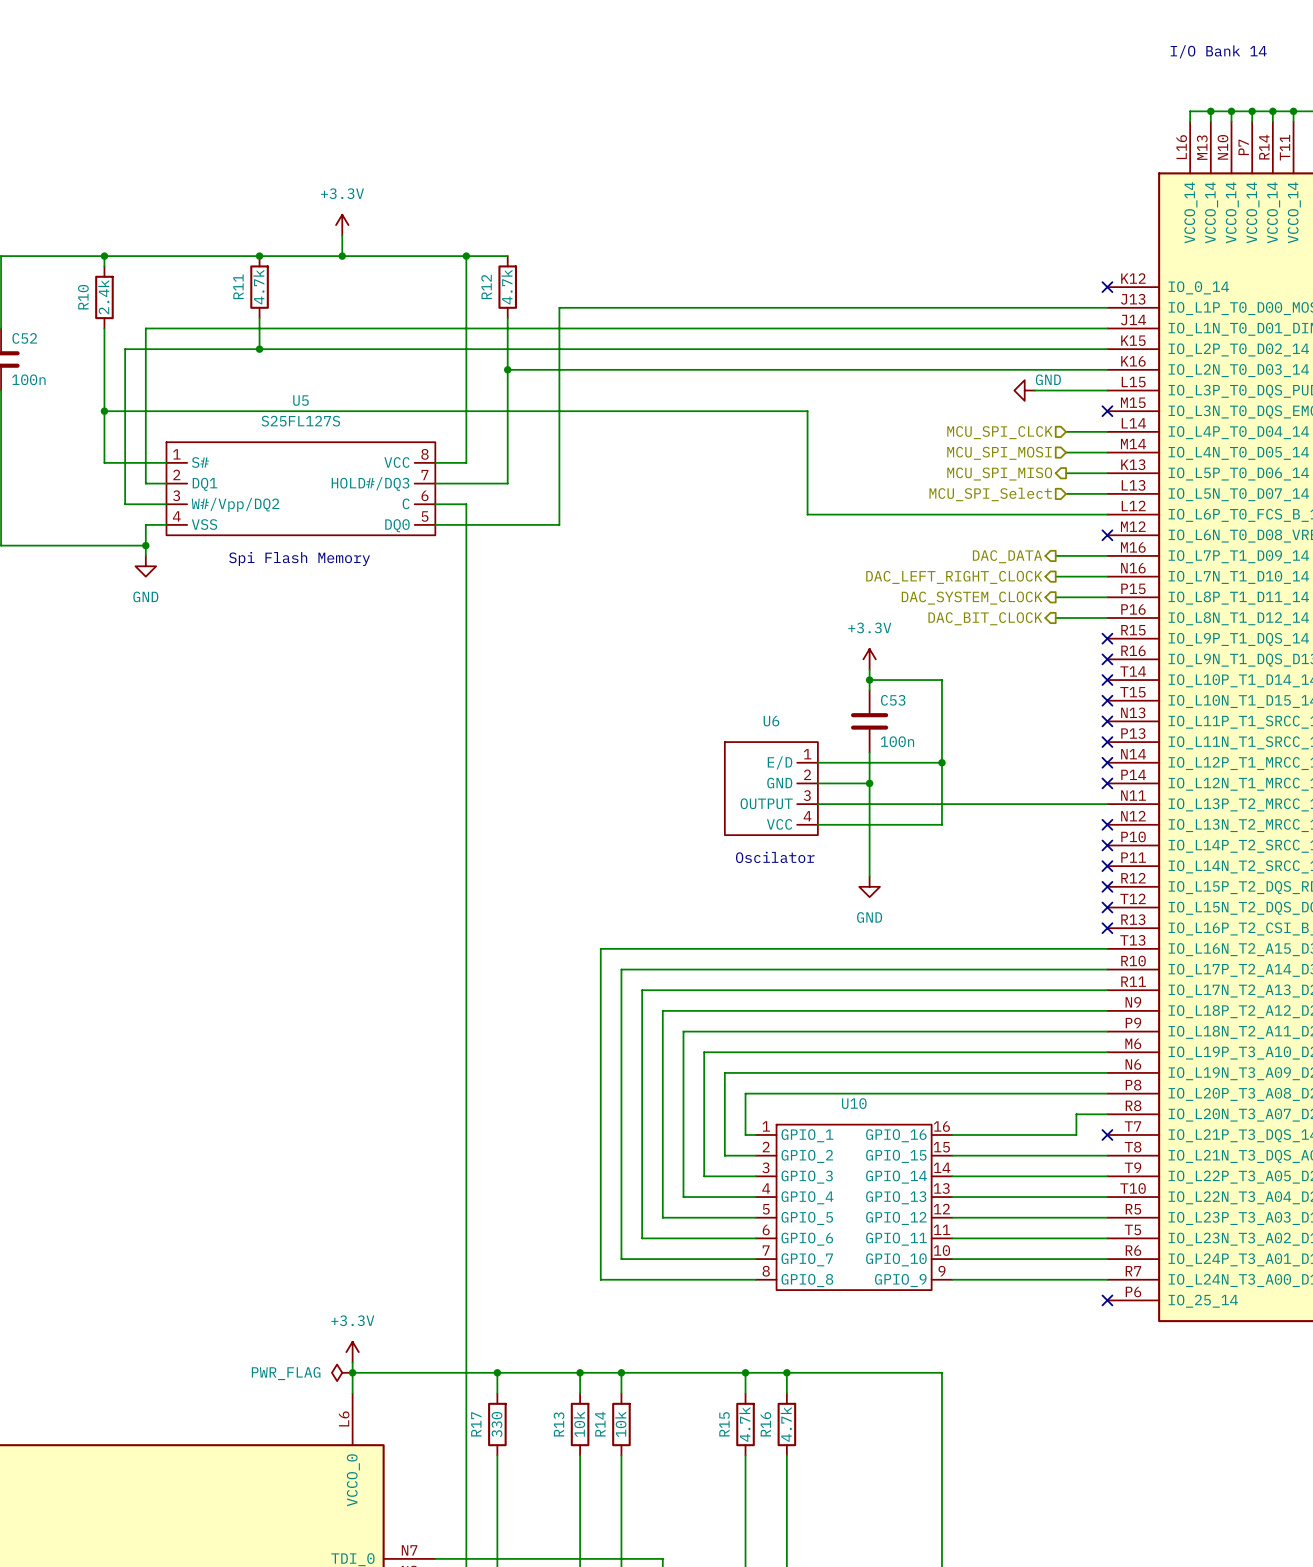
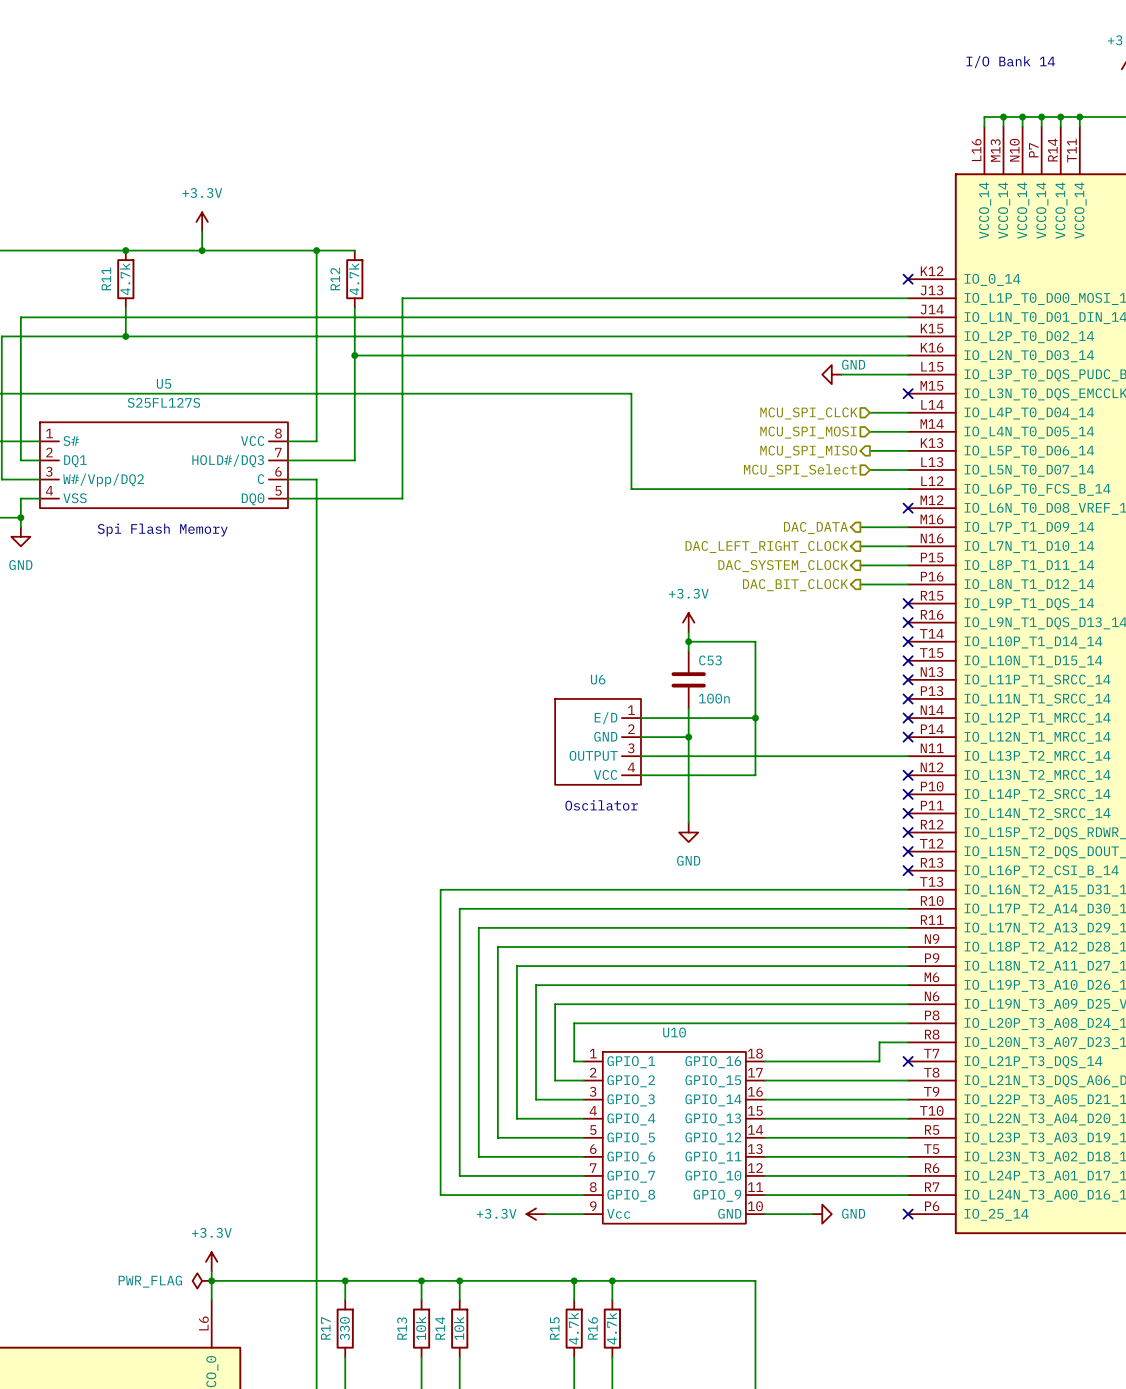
U10 symbol: [755, 1124, 953, 1291] -> [583, 1051, 766, 1224]
power symbol: none -> +3.3V (536, 1214)
wire: none -> (545, 1214) (583, 1214)
wire: none -> (765, 1214) (812, 1214)
power symbol: none -> GND (822, 1214)

